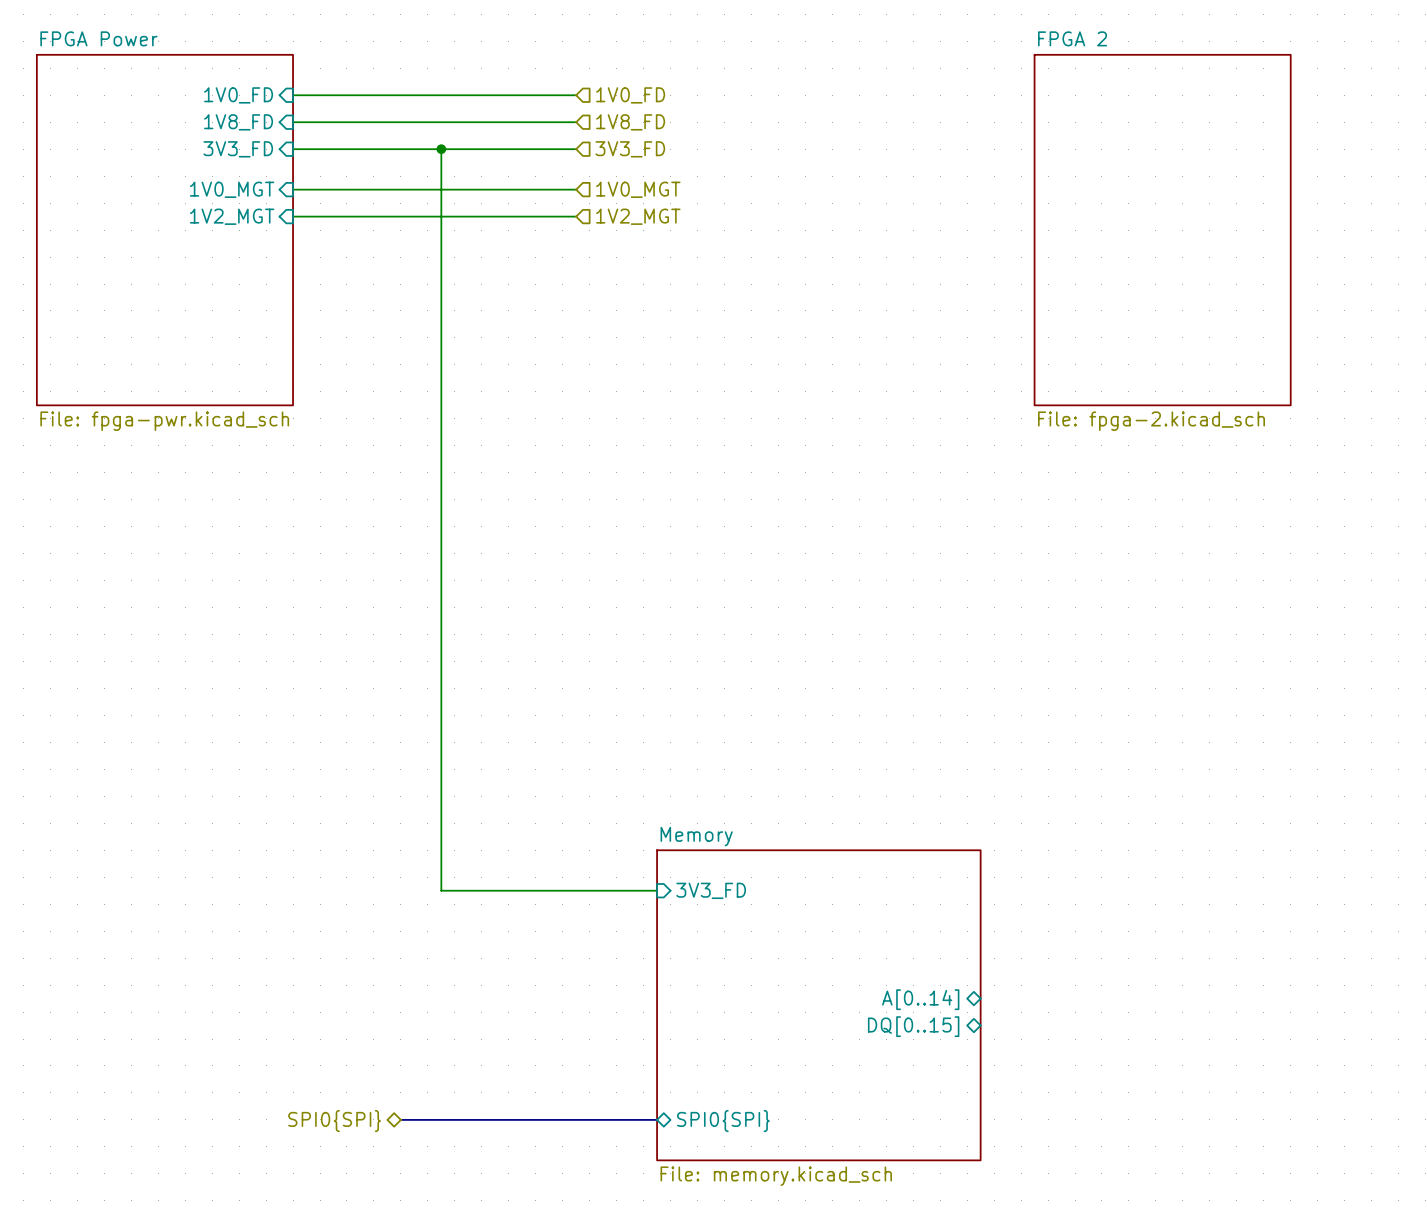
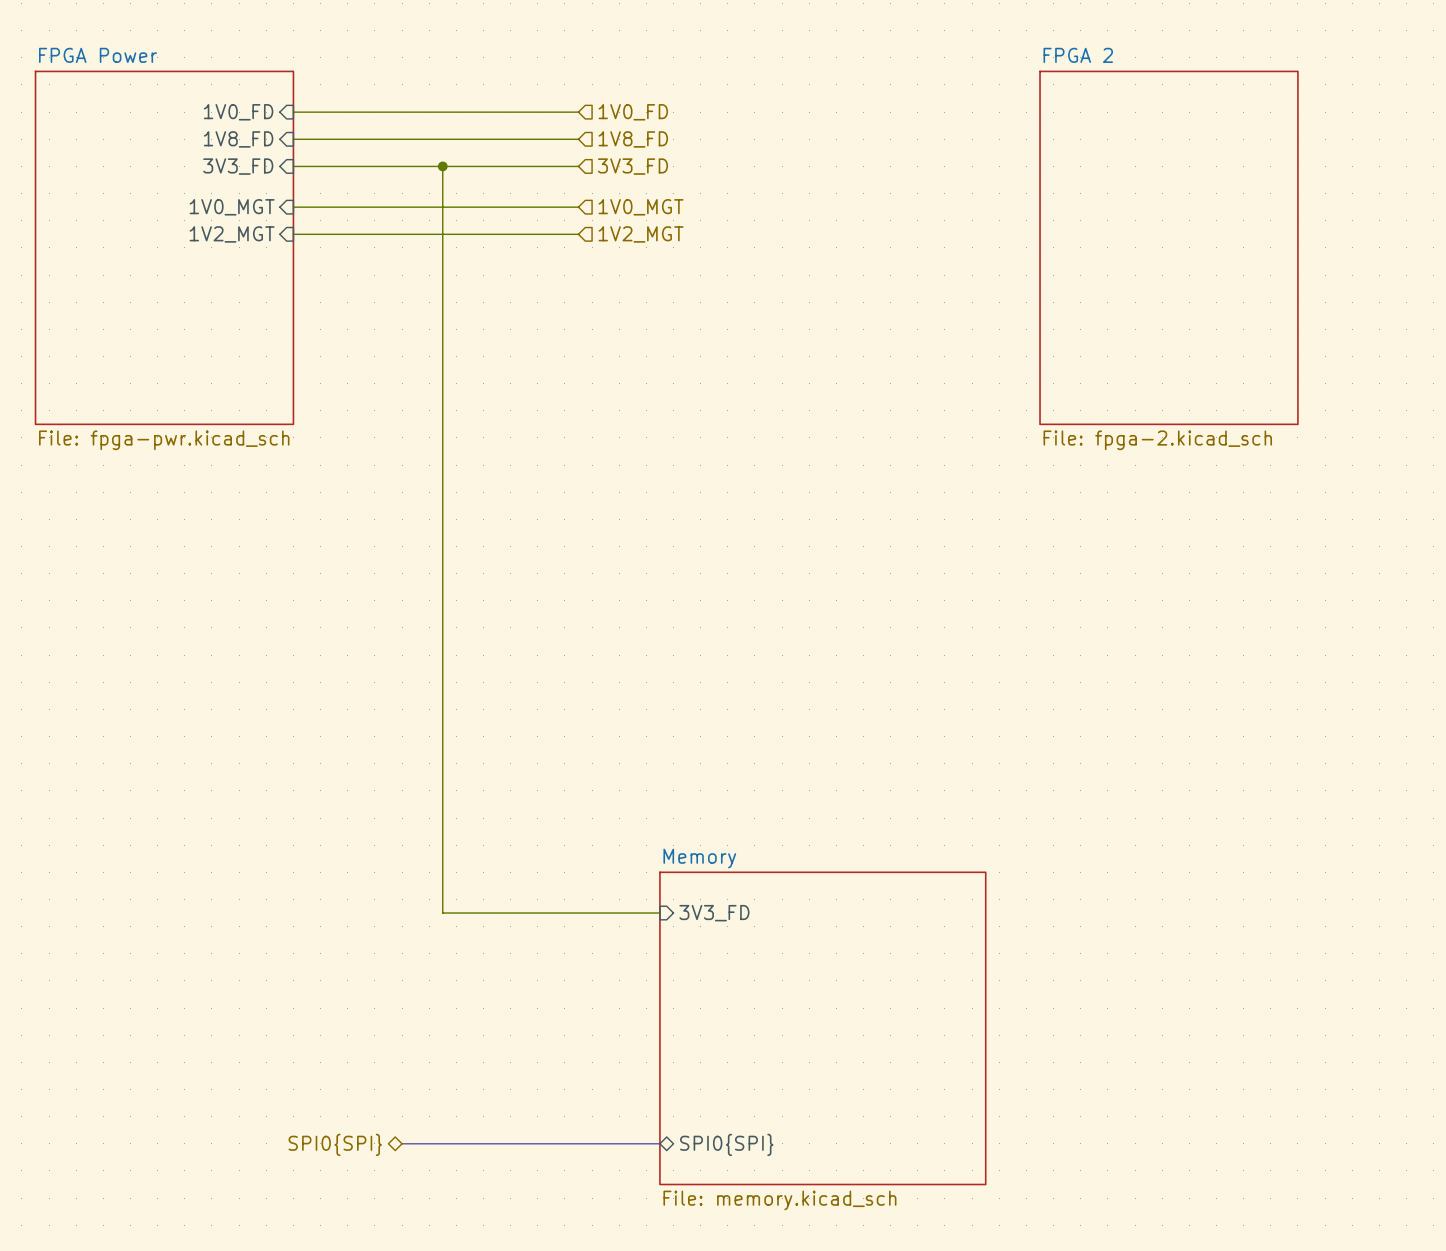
sheet pin: A[0..14] (920, 999) -> none
sheet pin: DQ[0..15] (913, 1026) -> none

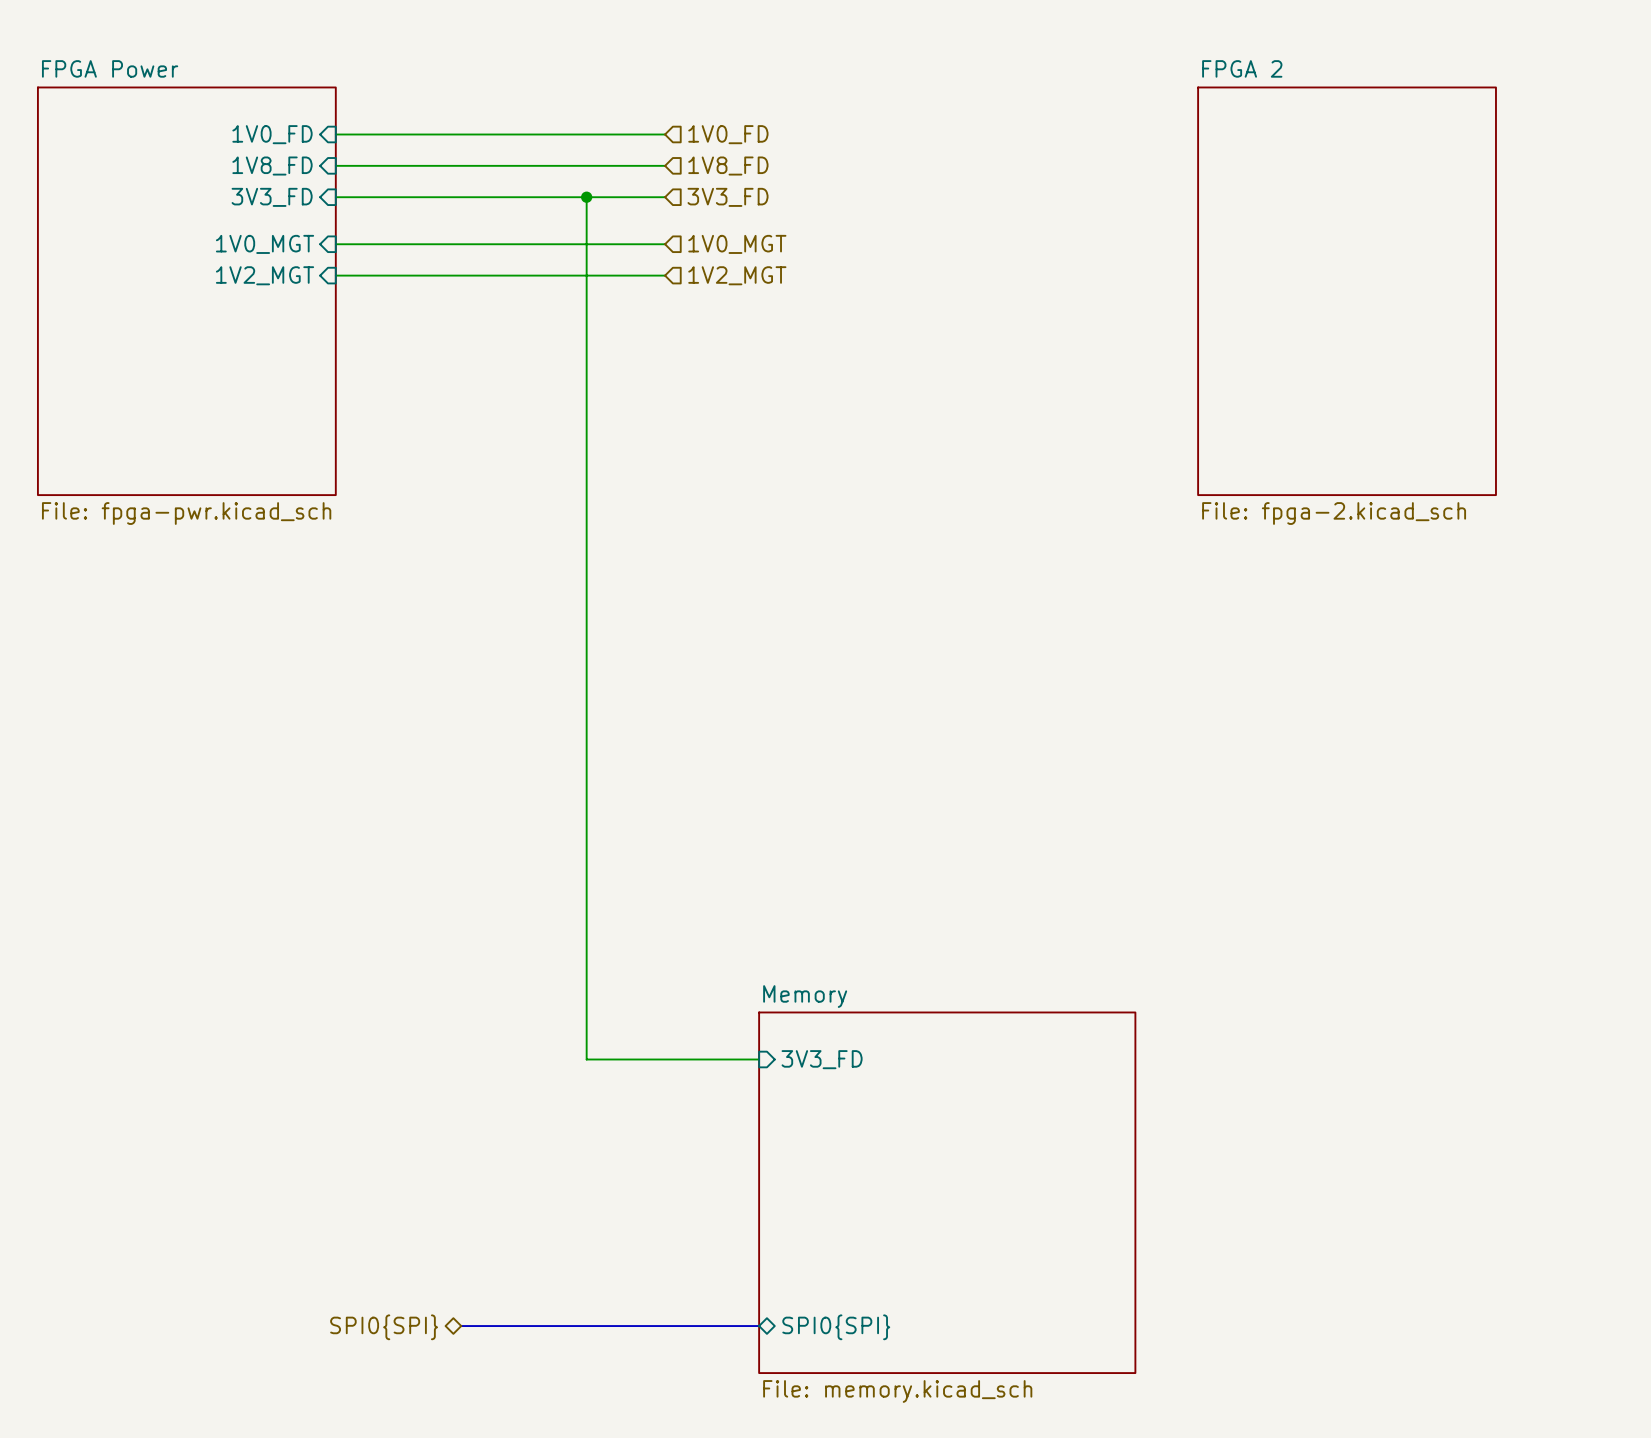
wire: (442, 166) (442, 913) (510, 913) -> (586, 197) (586, 1059)
junction: (442, 166) -> none
junction: none -> (586, 197)

